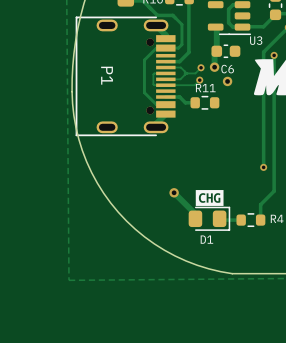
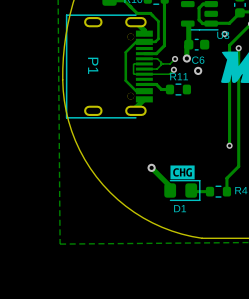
via: none -> (224, 33)

